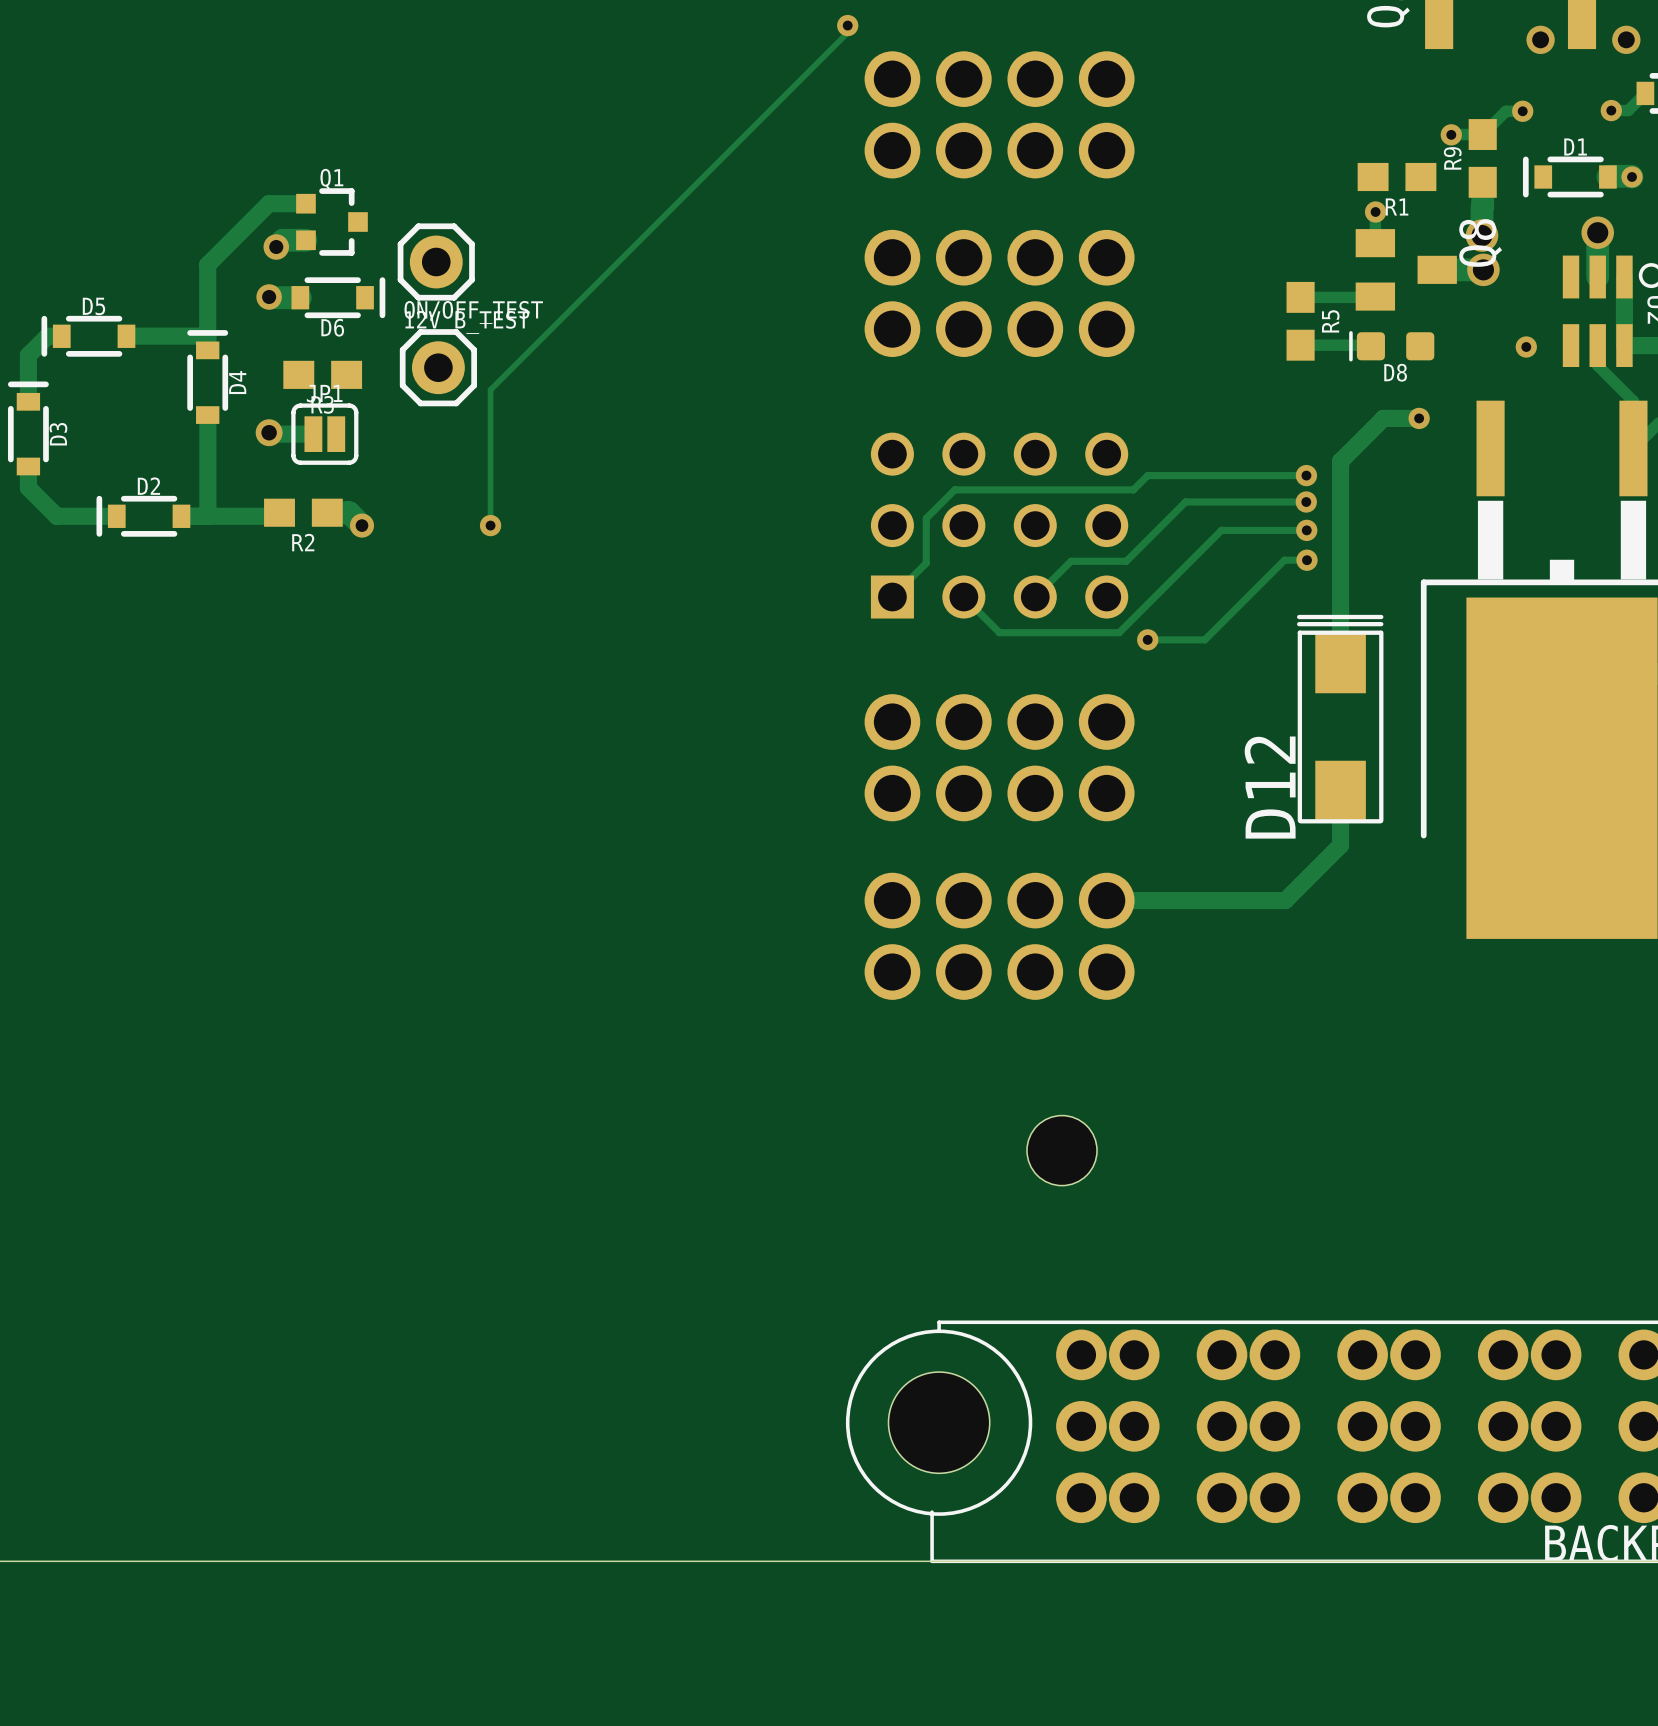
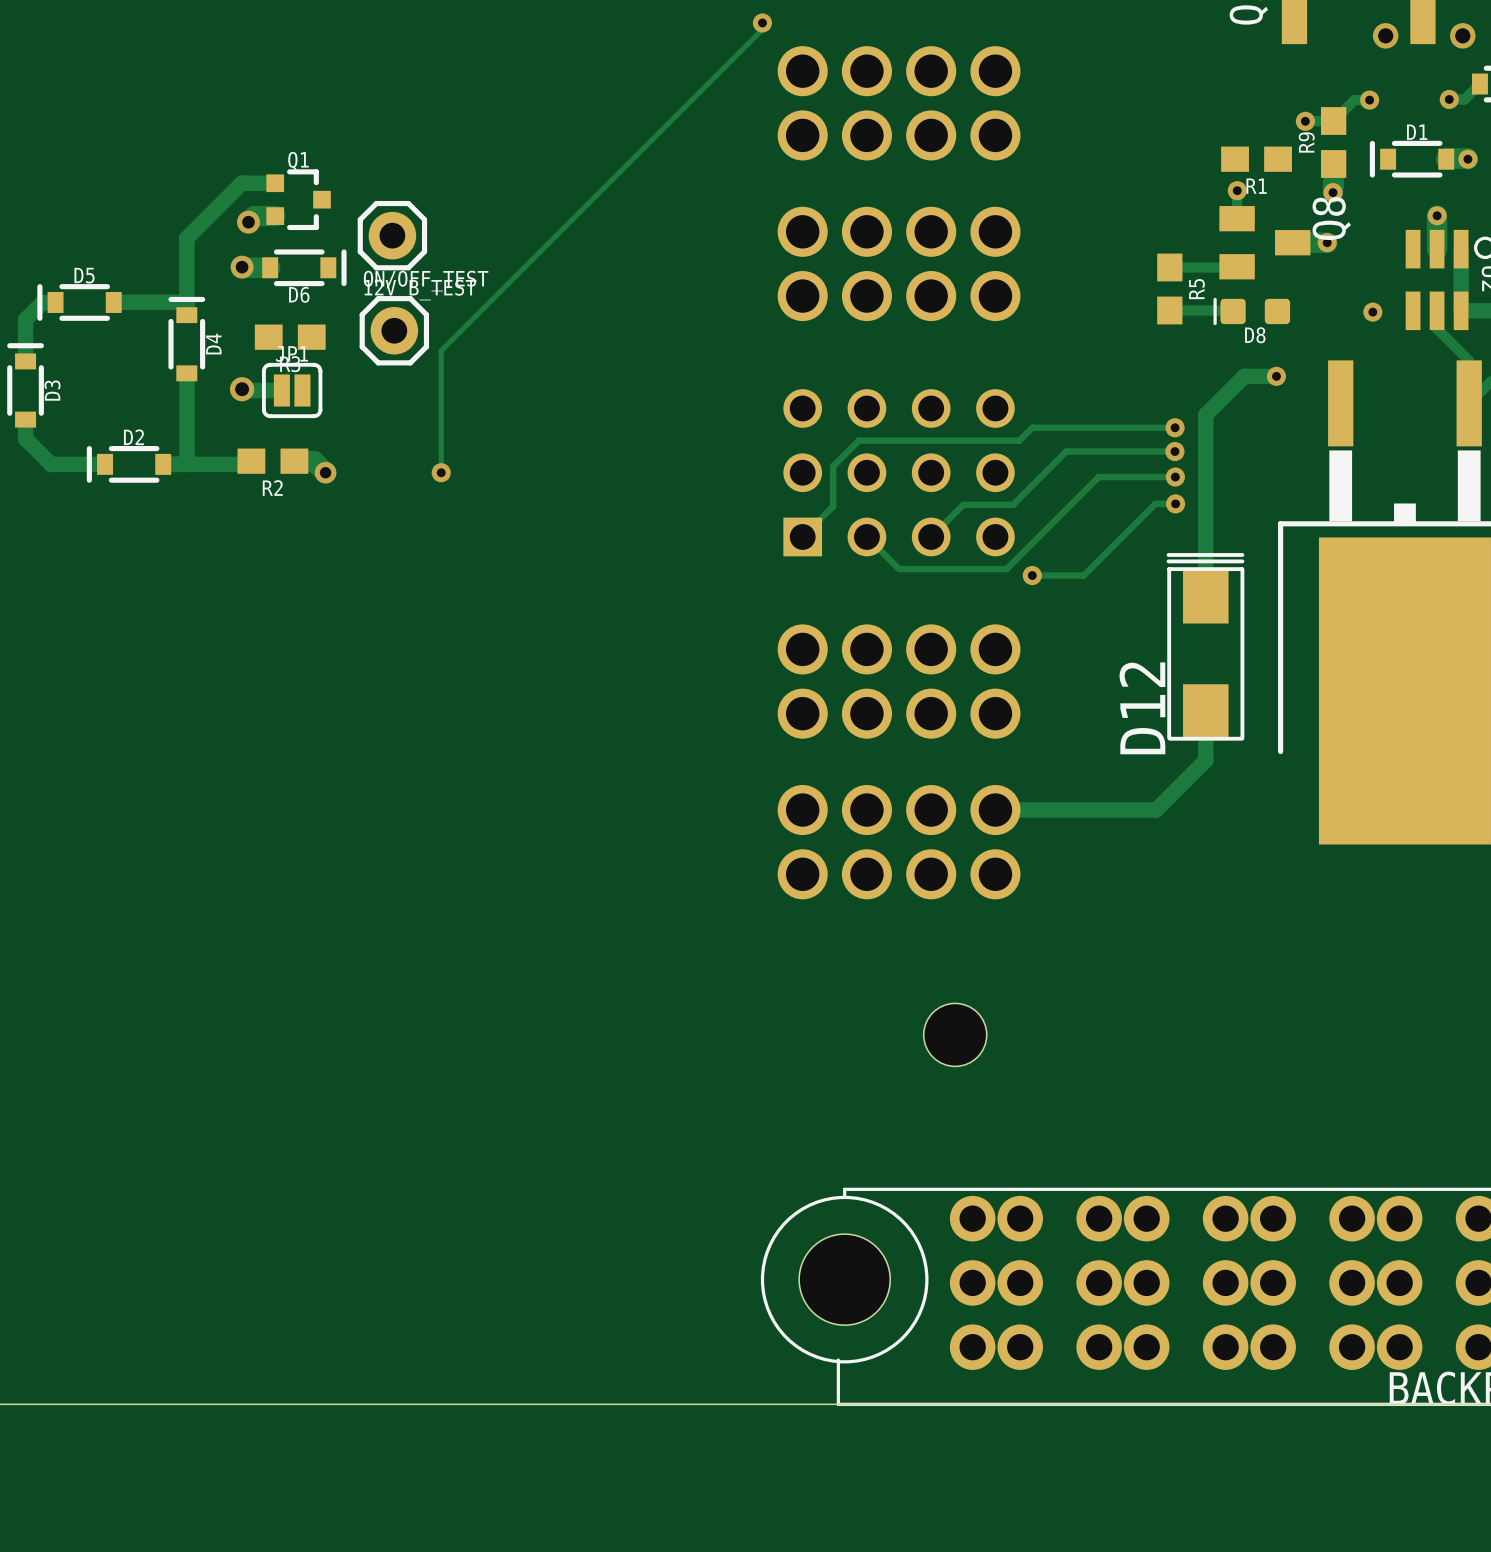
via size: [1581, 216, 1614, 249] -> [1427, 206, 1447, 226]
via size: [1465, 219, 1499, 252] -> [1323, 183, 1343, 203]
via size: [1467, 253, 1500, 287] -> [1317, 233, 1337, 253]

